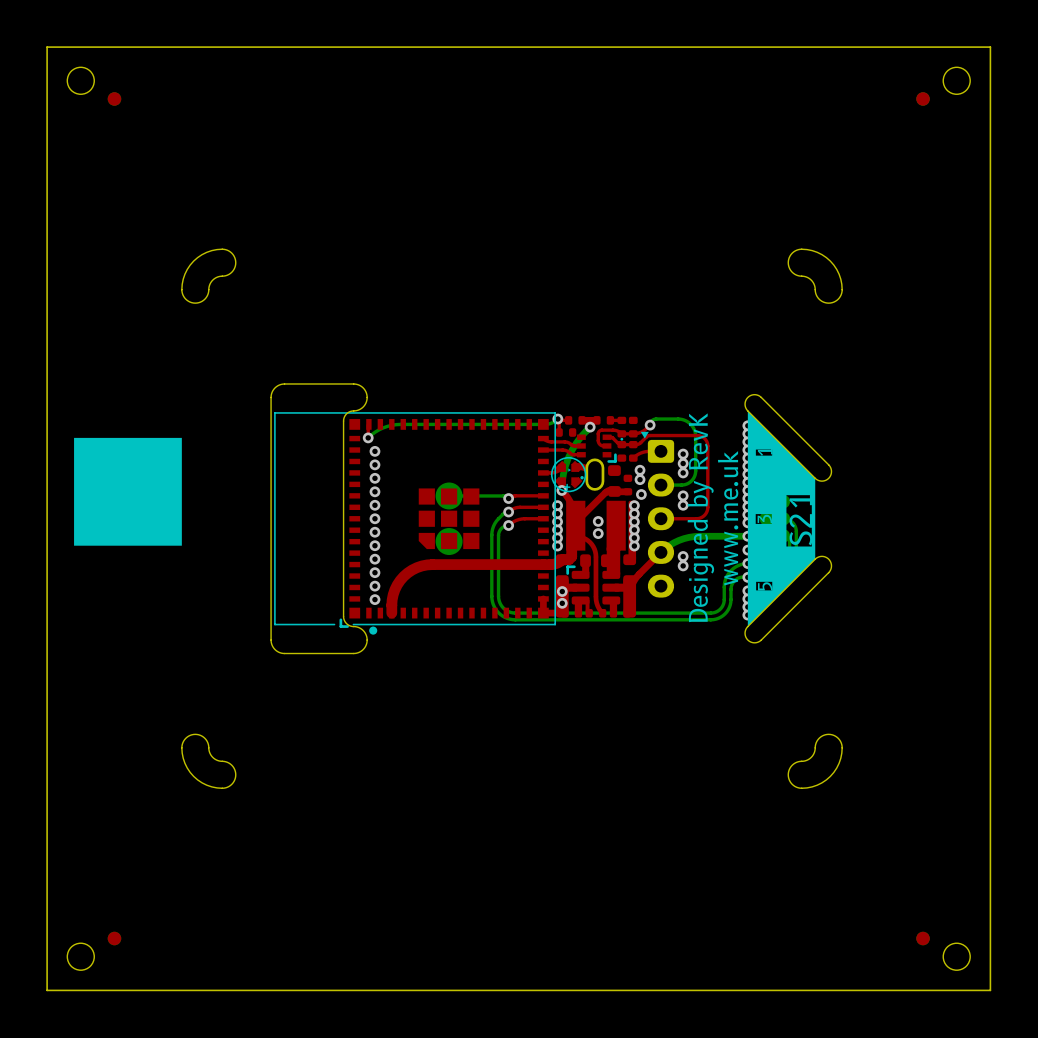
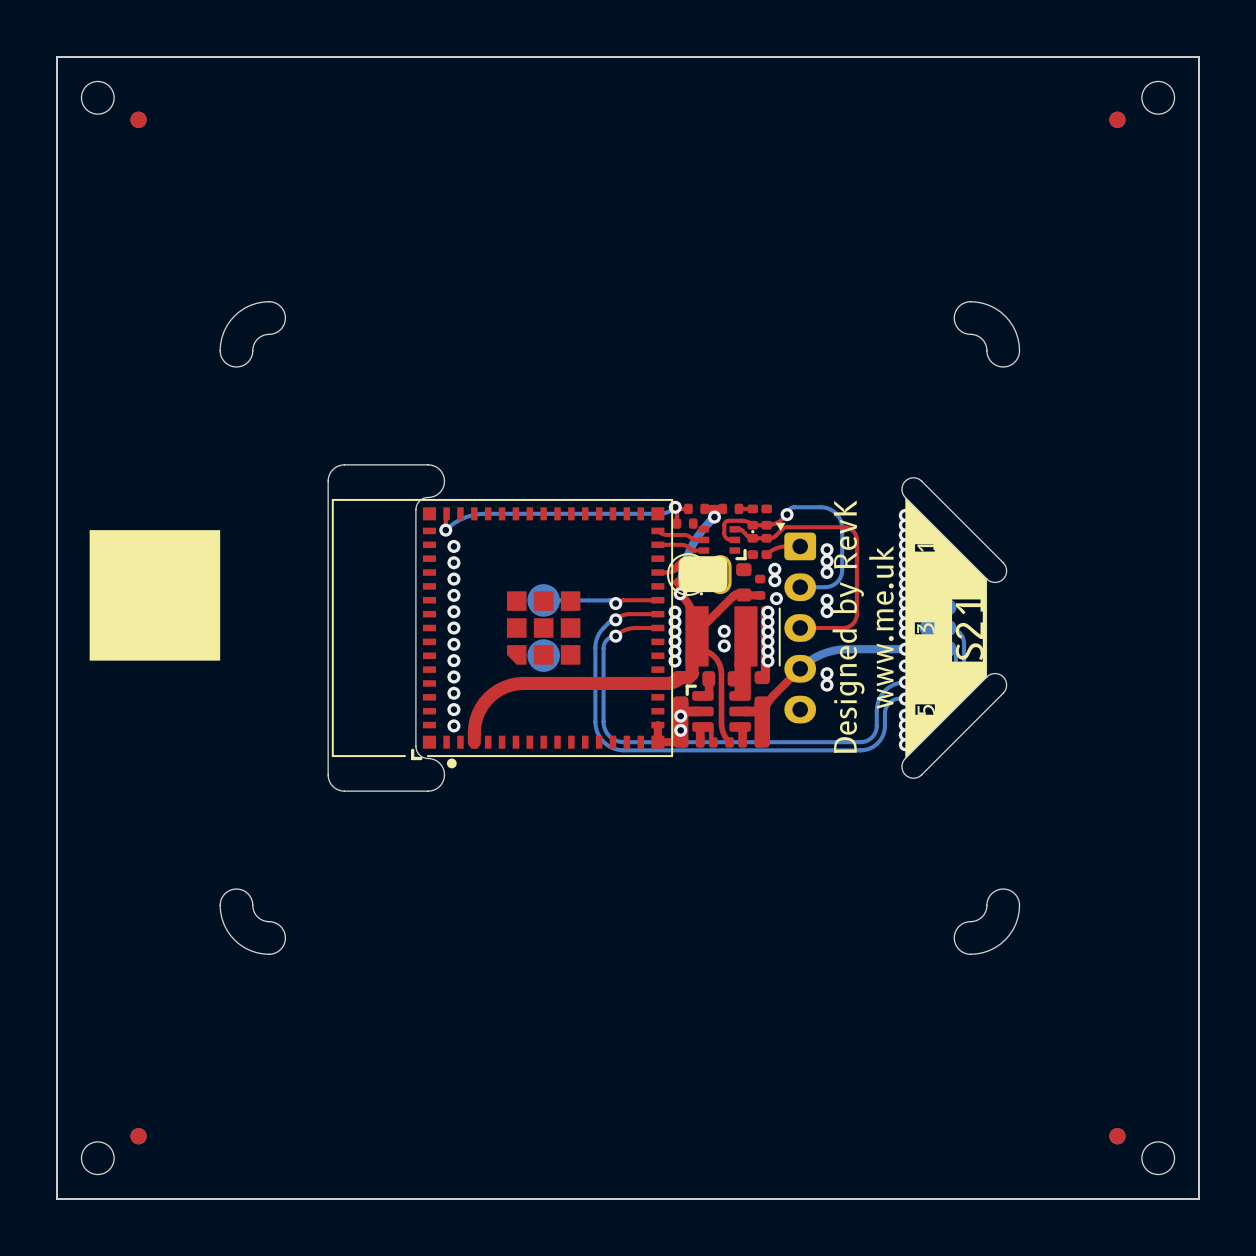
drawing: none -> [678, 556, 728, 596]
line: none -> (779, 608) (779, 665)

